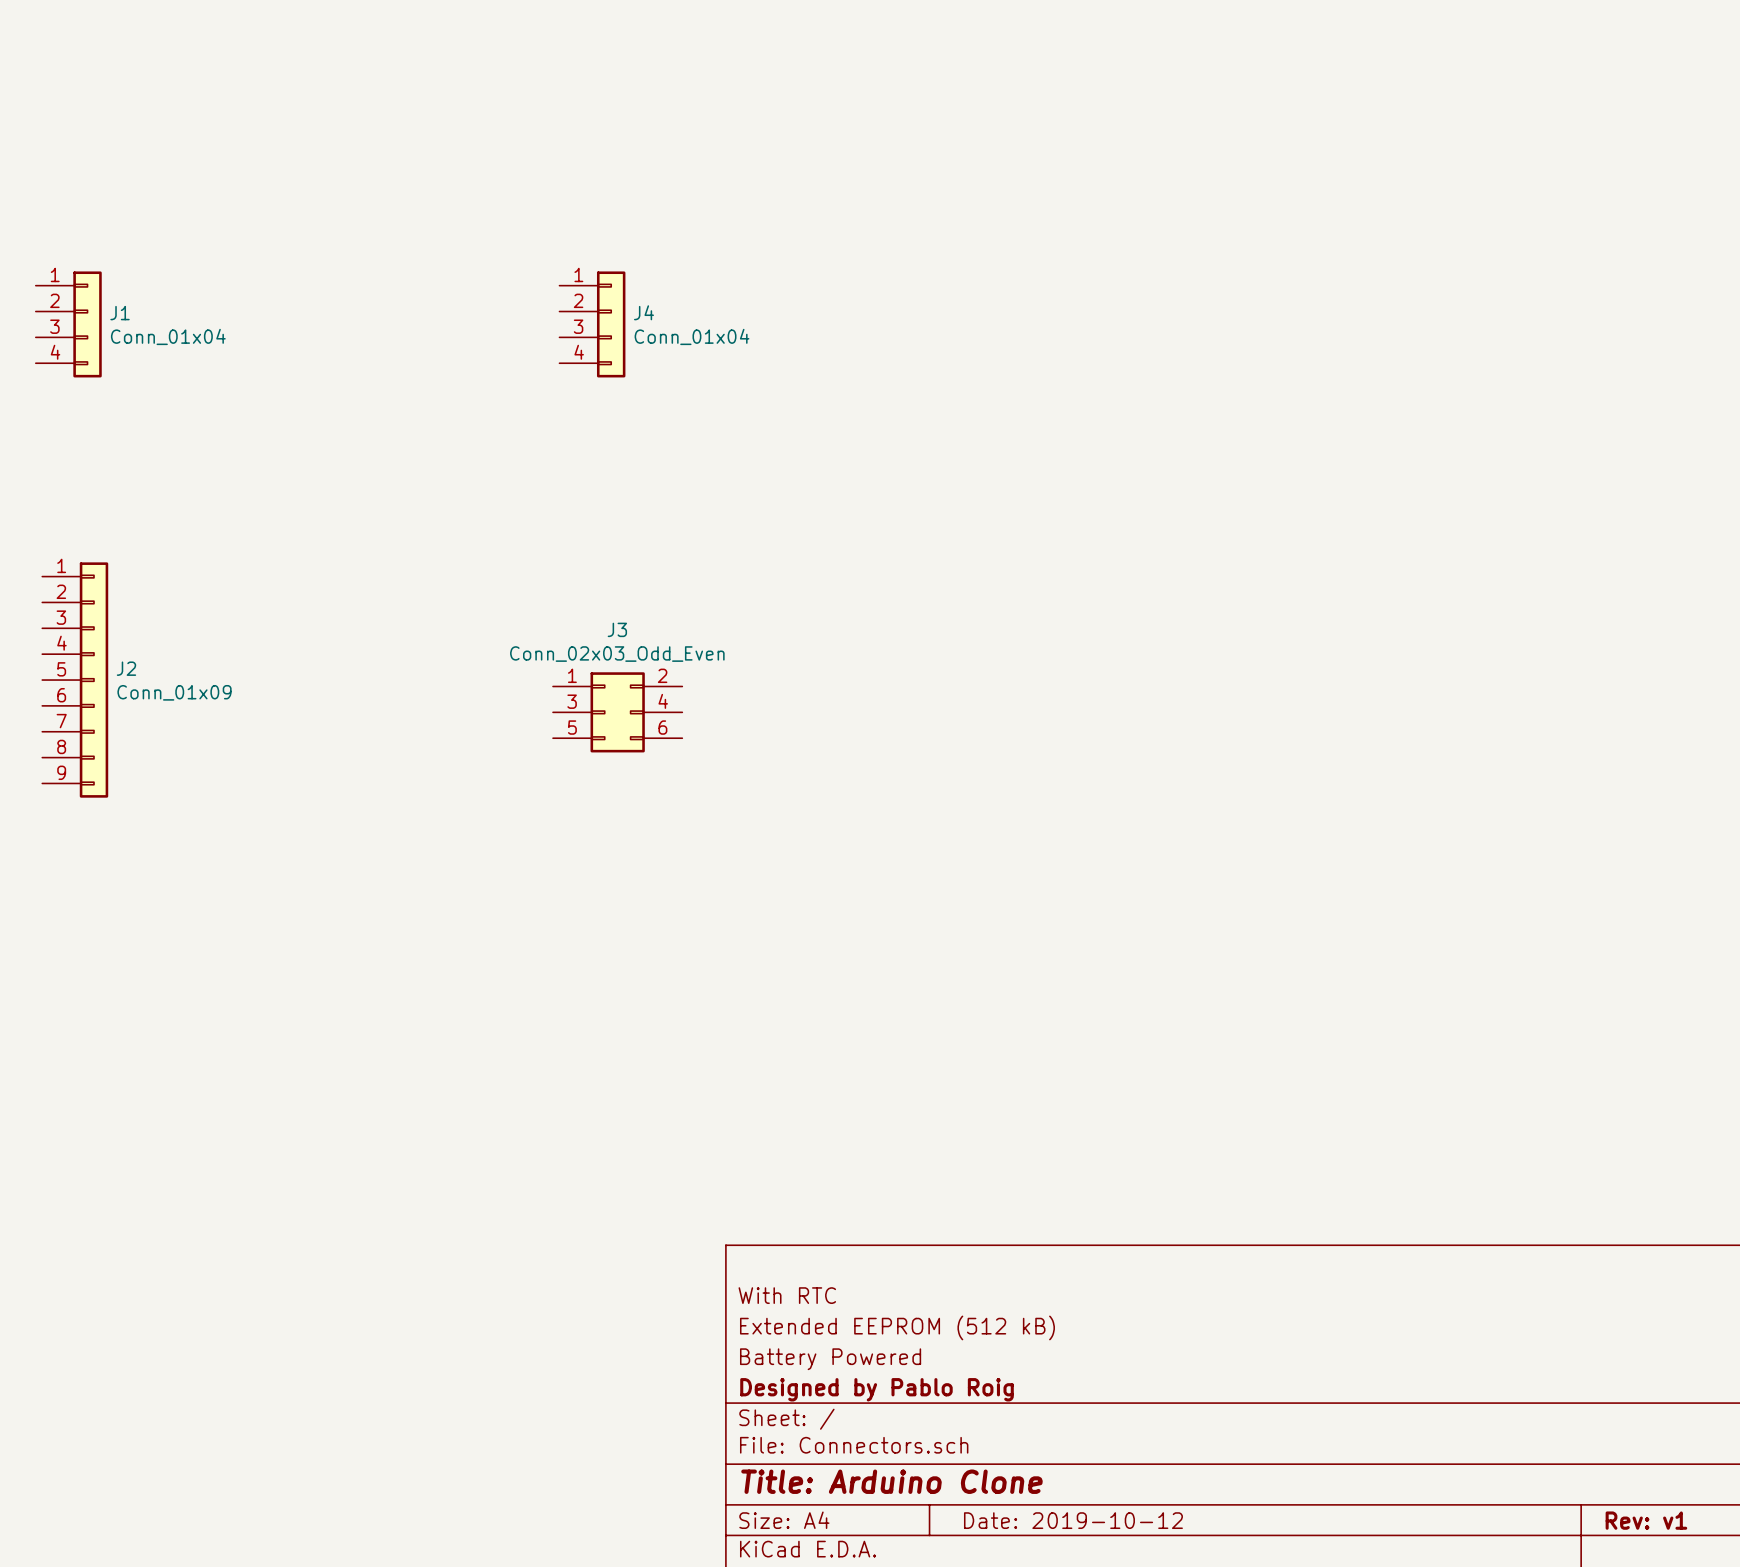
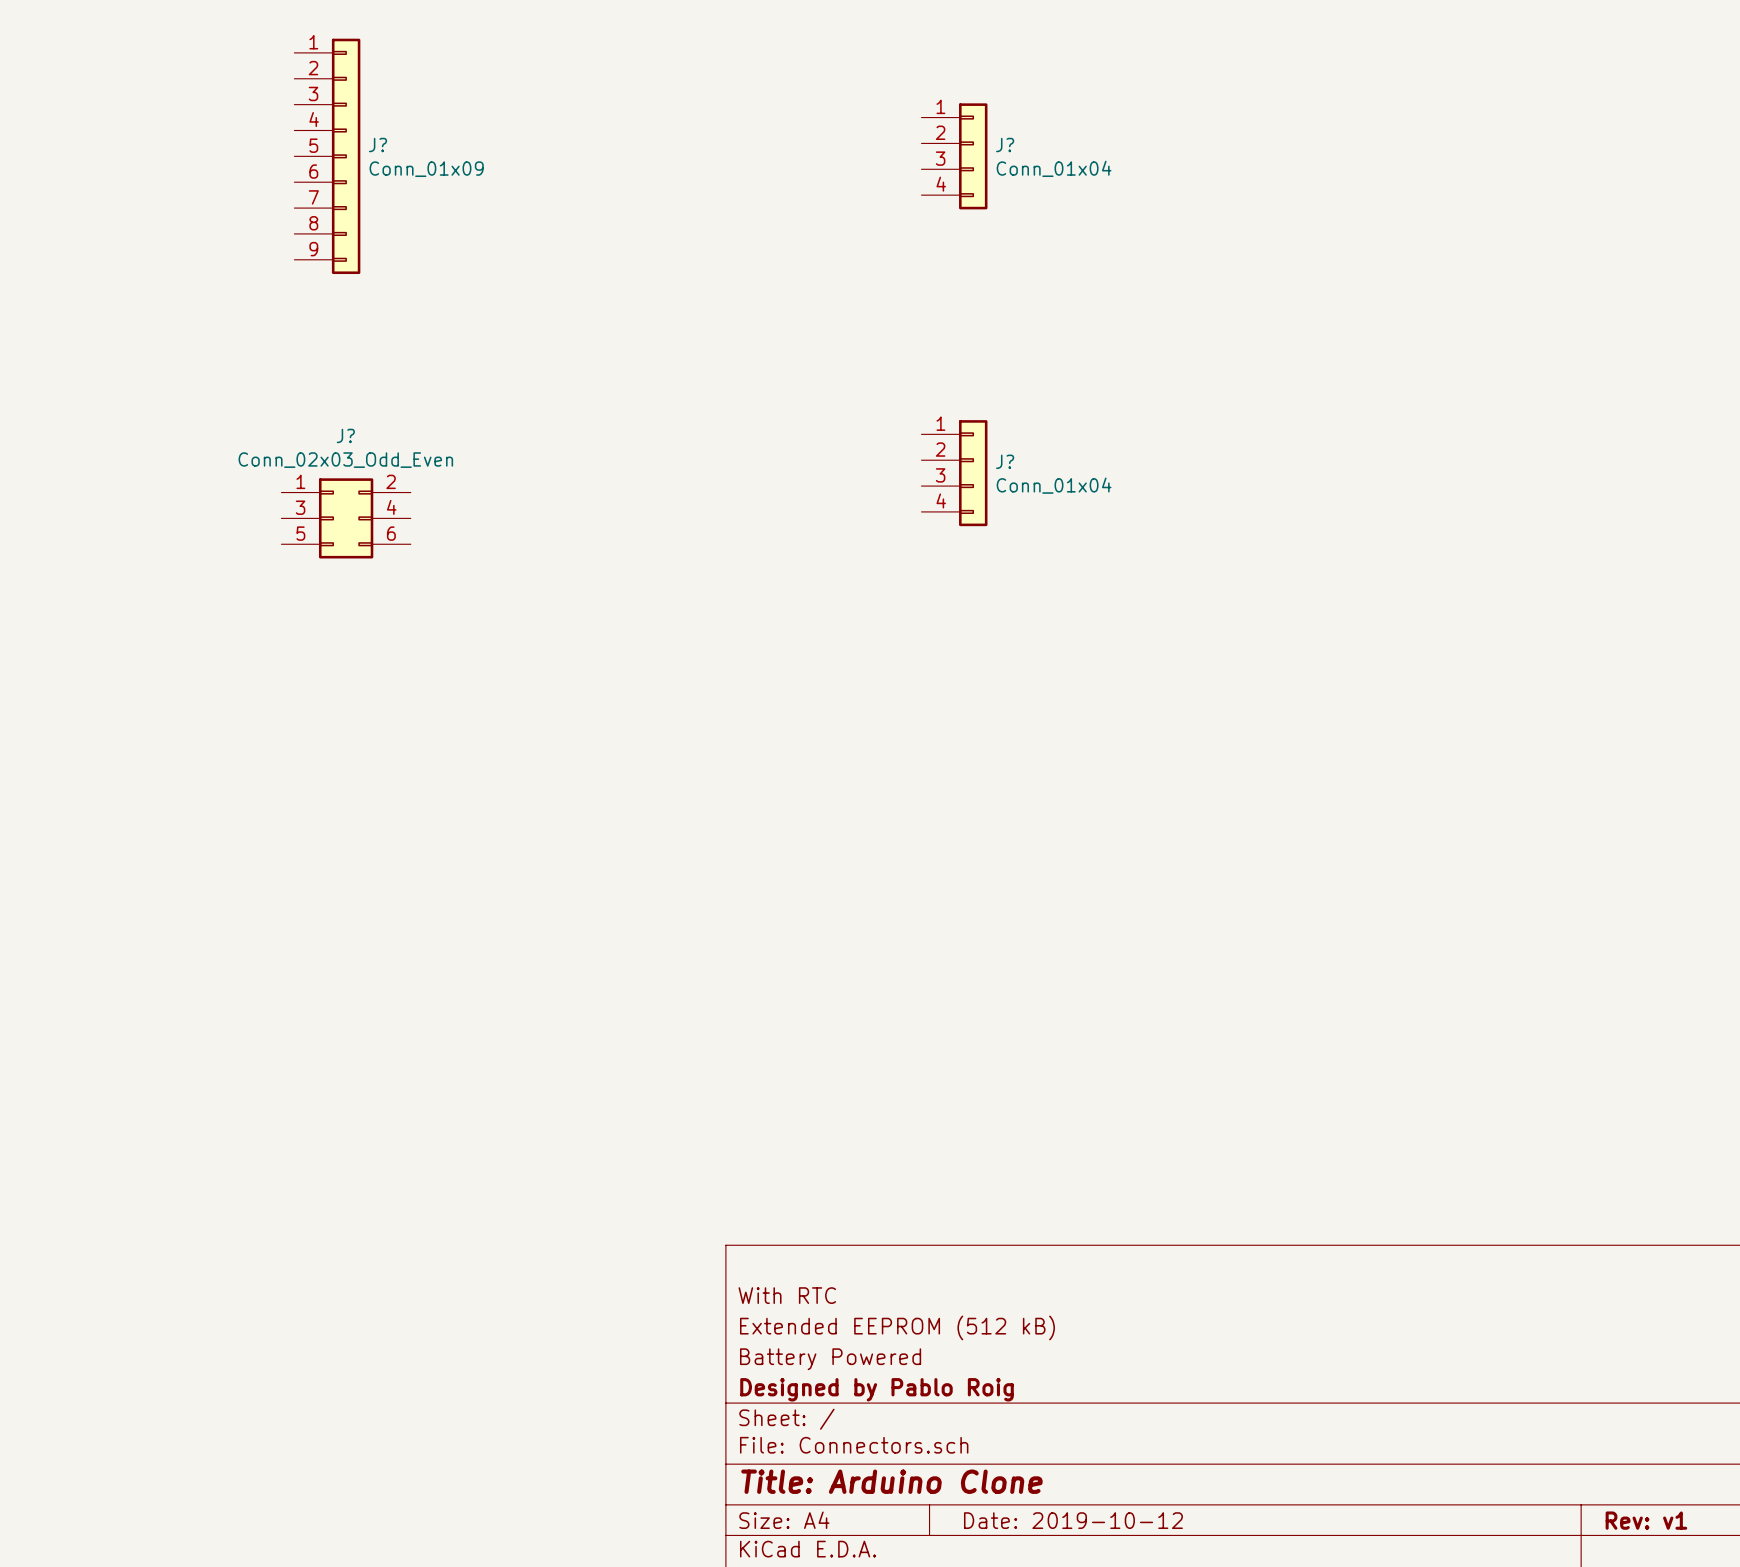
J?: none -> Conn_01x09 (327, 156)
J?: none -> Conn_01x04 (954, 156)
J1: Conn_01x04 (68, 324) -> none
J4: Conn_01x04 (592, 324) -> none
J?: none -> Conn_01x04 (954, 473)
J?: none -> Conn_02x03_Odd_Even (346, 518)
J2: Conn_01x09 (75, 680) -> none
J3: Conn_02x03_Odd_Even (617, 712) -> none

